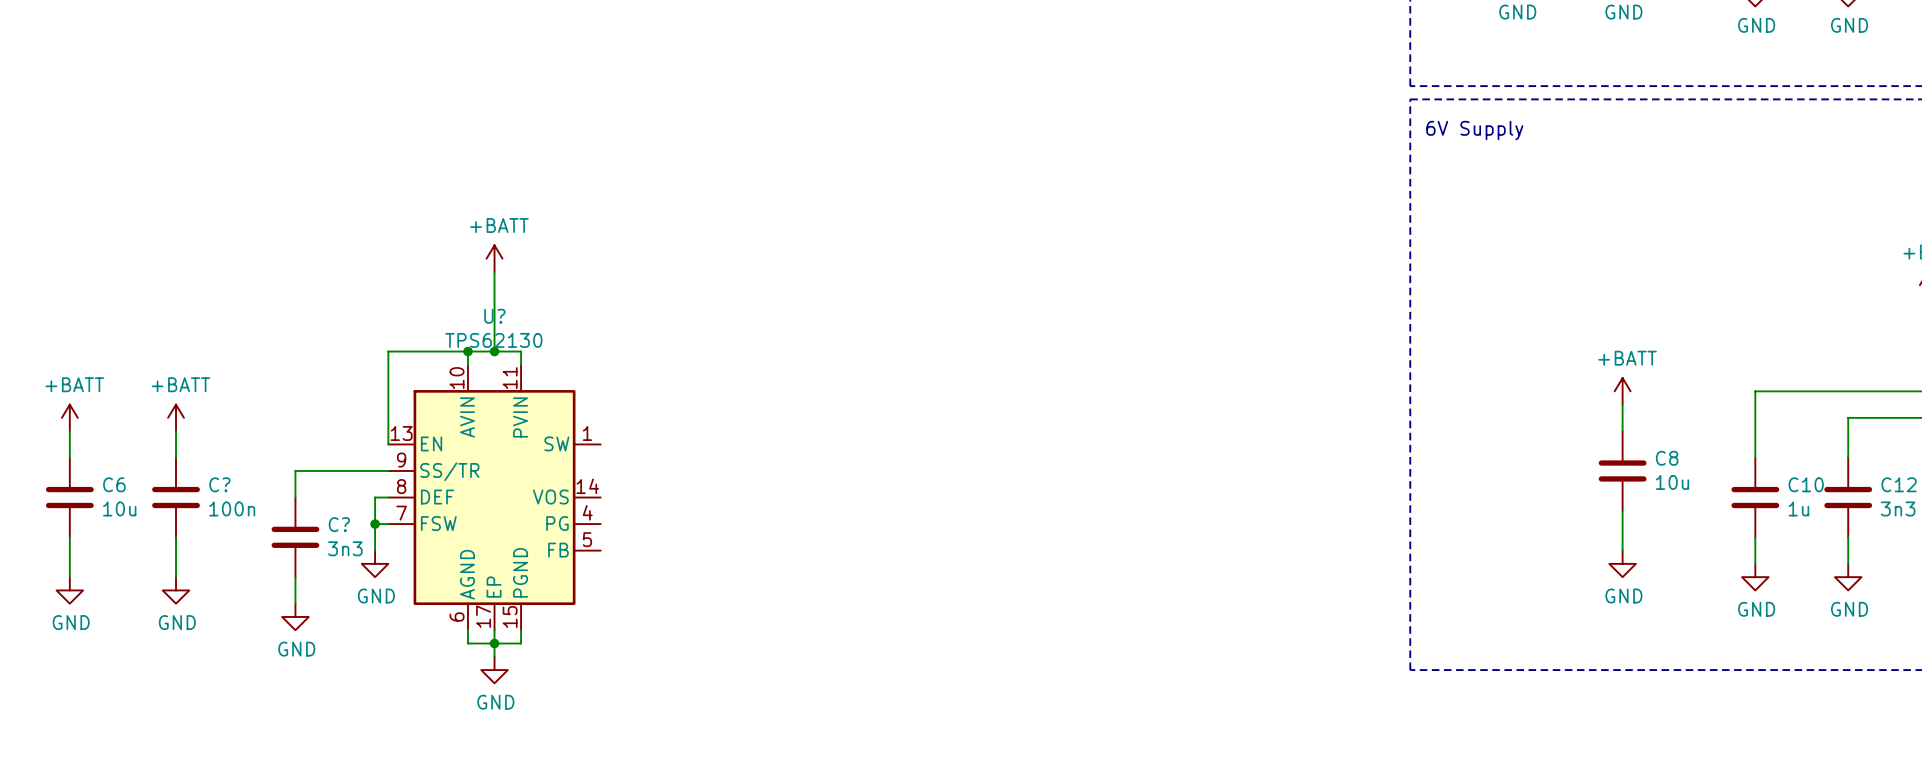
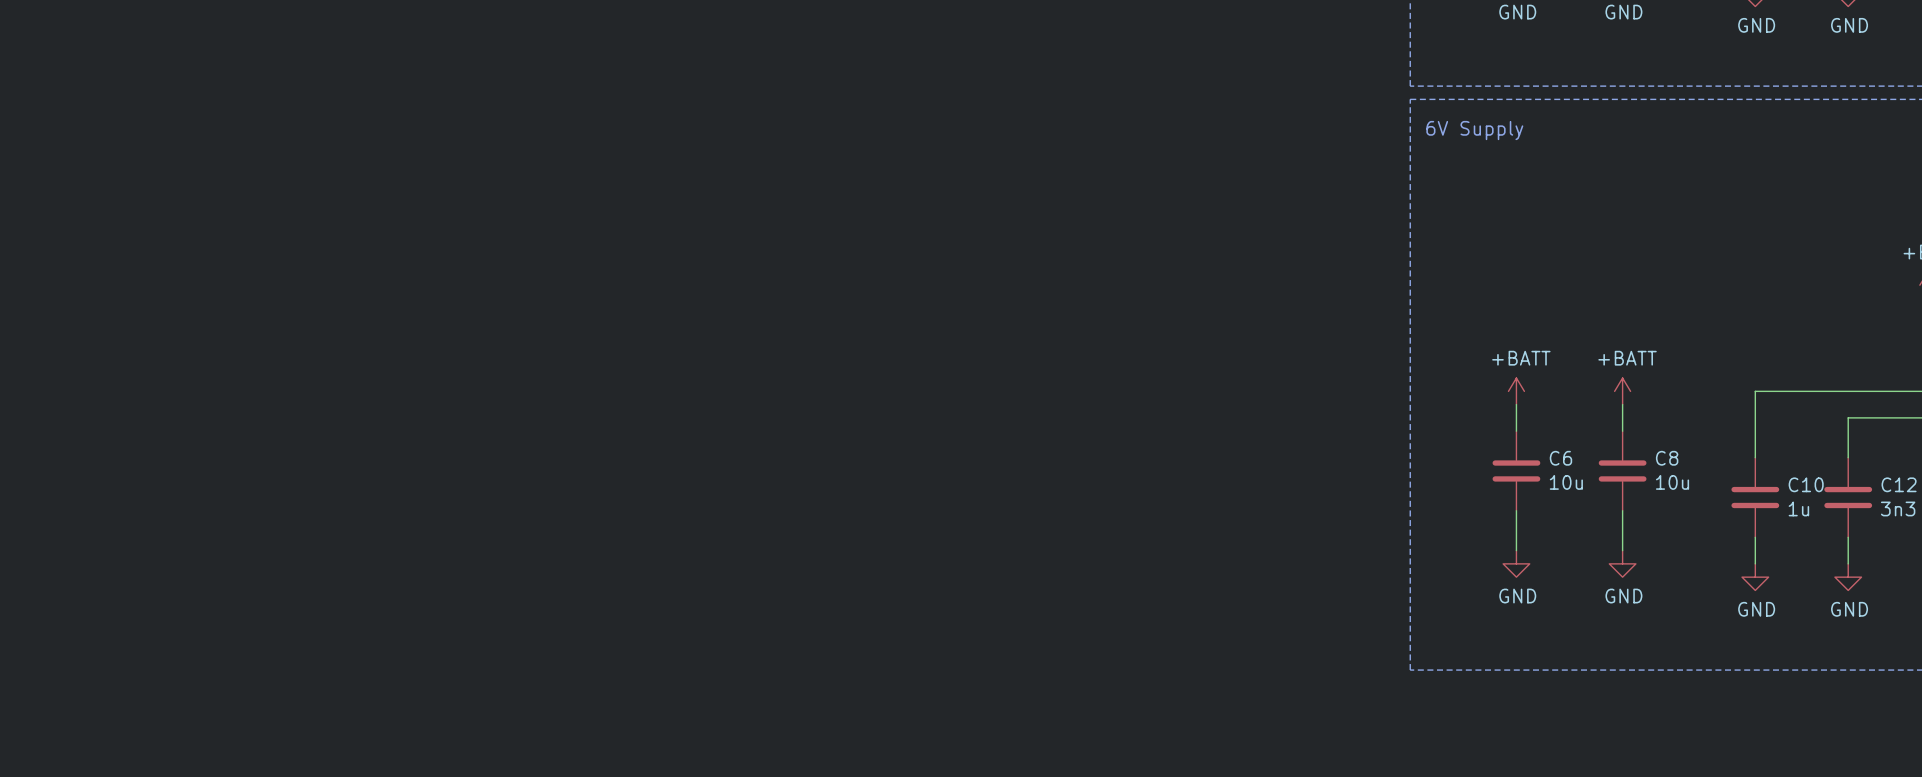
power symbol: +BATT (494, 258) -> none
wire: (494, 271) (494, 351) -> none
wire: (467, 351) (467, 364) -> none
junction: (467, 351) -> none
junction: (494, 351) -> none
wire: (521, 364) (521, 351) (388, 351) (388, 444) -> none
power symbol: none -> +BATT (1516, 391)
wire: none -> (1516, 404) (1516, 431)
power symbol: +BATT (69, 417) -> none
power symbol: +BATT (176, 417) -> none
wire: (69, 431) (69, 457) -> none
wire: (176, 431) (176, 457) -> none
wire: (388, 470) (295, 470) (295, 497) -> none
C6 position: (69, 497) -> (1516, 470)
C?: 100n (176, 497) -> none
wire: (388, 497) (375, 497) (375, 550) -> none
U?: TPS62130 (494, 497) -> none
wire: none -> (1516, 510) (1516, 550)
wire: (375, 524) (388, 524) -> none
junction: (375, 524) -> none
wire: (69, 537) (69, 577) -> none
wire: (176, 537) (176, 577) -> none
C?: 3n3 (295, 537) -> none
power symbol: GND (375, 563) -> none
power symbol: none -> GND (1516, 563)
wire: (295, 577) (295, 603) -> none
power symbol: GND (69, 590) -> none
power symbol: GND (176, 590) -> none
power symbol: GND (295, 616) -> none
wire: (467, 630) (467, 643) (521, 643) (521, 630) -> none
wire: (494, 630) (494, 656) -> none
junction: (494, 643) -> none
power symbol: GND (494, 670) -> none

